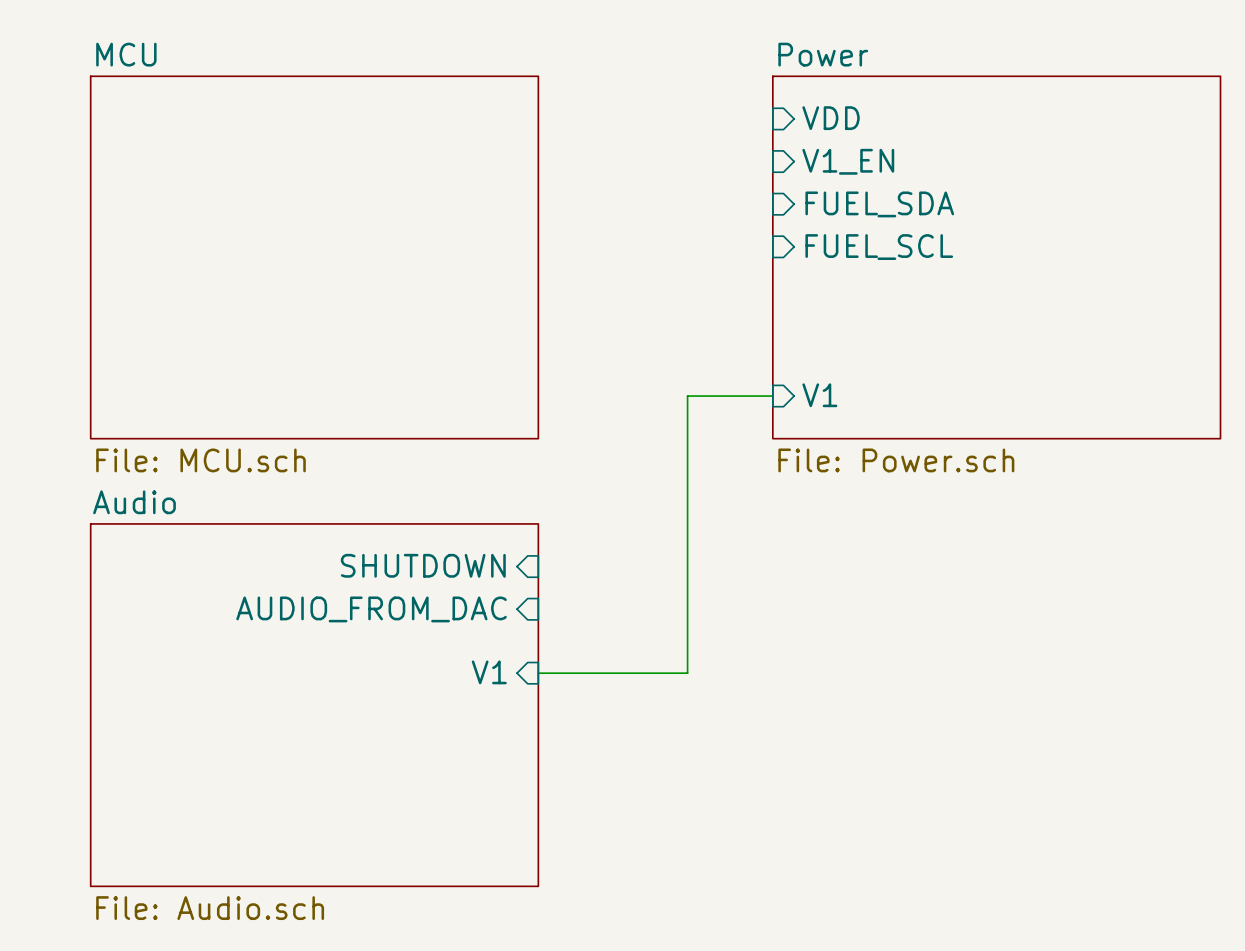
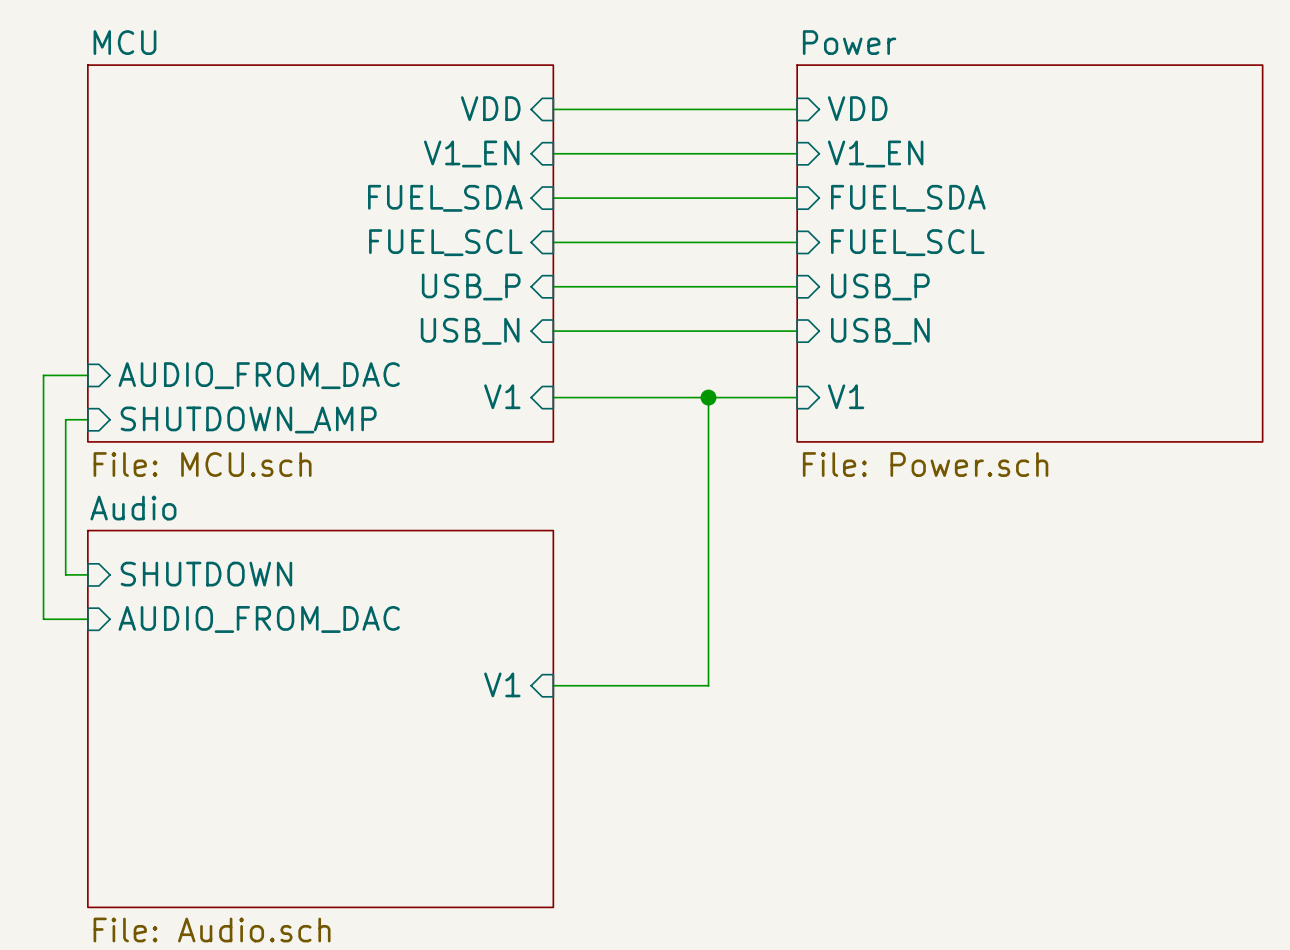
sheet pin: none -> VDD (490, 108)
wire: none -> (553, 109) (797, 109)
sheet pin: none -> V1_EN (471, 153)
wire: none -> (553, 153) (797, 153)
sheet pin: none -> FUEL_SDA (445, 198)
wire: none -> (553, 198) (797, 198)
wire: none -> (553, 242) (797, 242)
sheet pin: none -> FUEL_SCL (445, 242)
sheet pin: none -> USB_P (471, 286)
wire: none -> (553, 286) (797, 286)
sheet pin: none -> USB_P (880, 286)
sheet pin: none -> USB_N (470, 331)
wire: none -> (553, 331) (797, 331)
sheet pin: none -> USB_N (880, 331)
wire: none -> (87, 375) (43, 375) (43, 619) (87, 619)
sheet pin: none -> AUDIO_FROM_DAC (259, 375)
sheet pin: none -> V1 (502, 396)
wire: none -> (553, 397) (708, 397)
junction: none -> (708, 397)
wire: none -> (87, 419) (65, 419) (65, 574) (87, 574)
sheet pin: none -> SHUTDOWN_AMP (248, 419)
sheet pin rotation: 0° (423, 565) -> 180° (206, 574)
sheet pin rotation: 0° (371, 609) -> 180° (259, 619)

